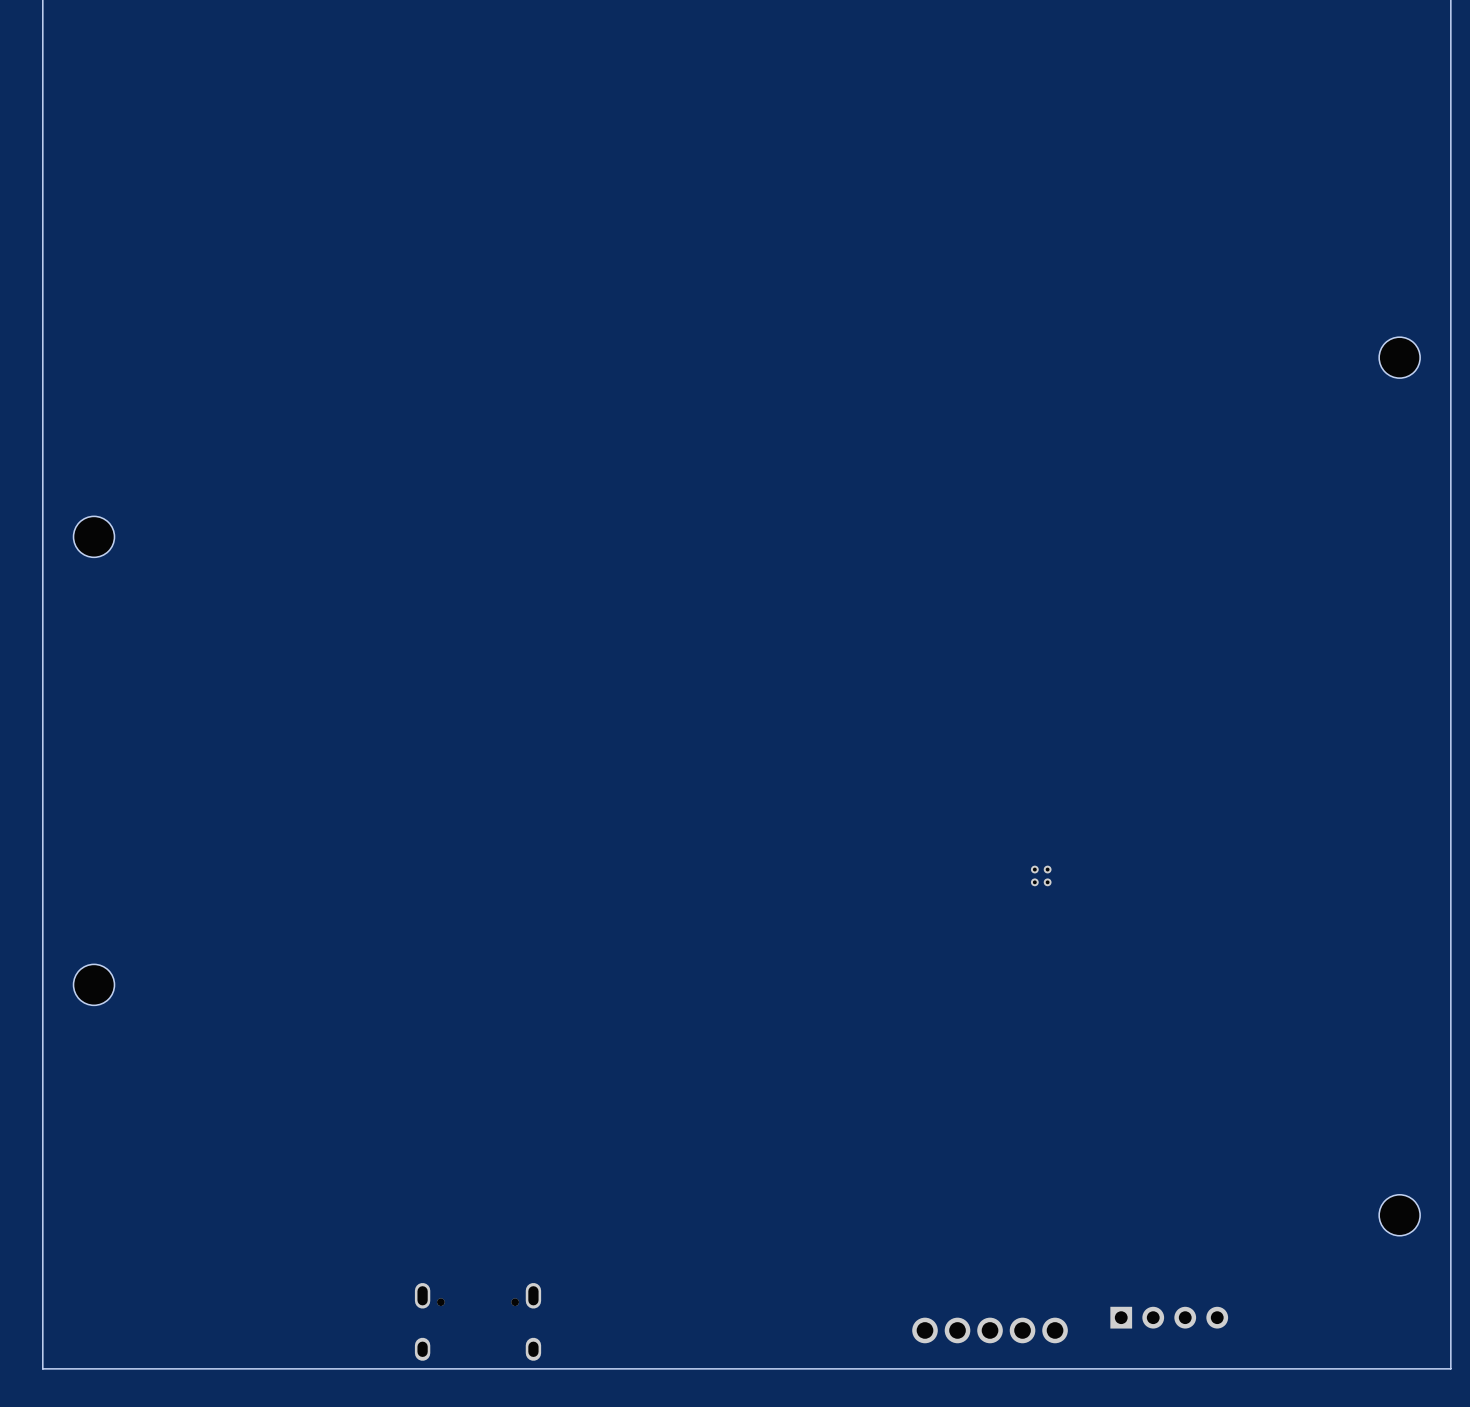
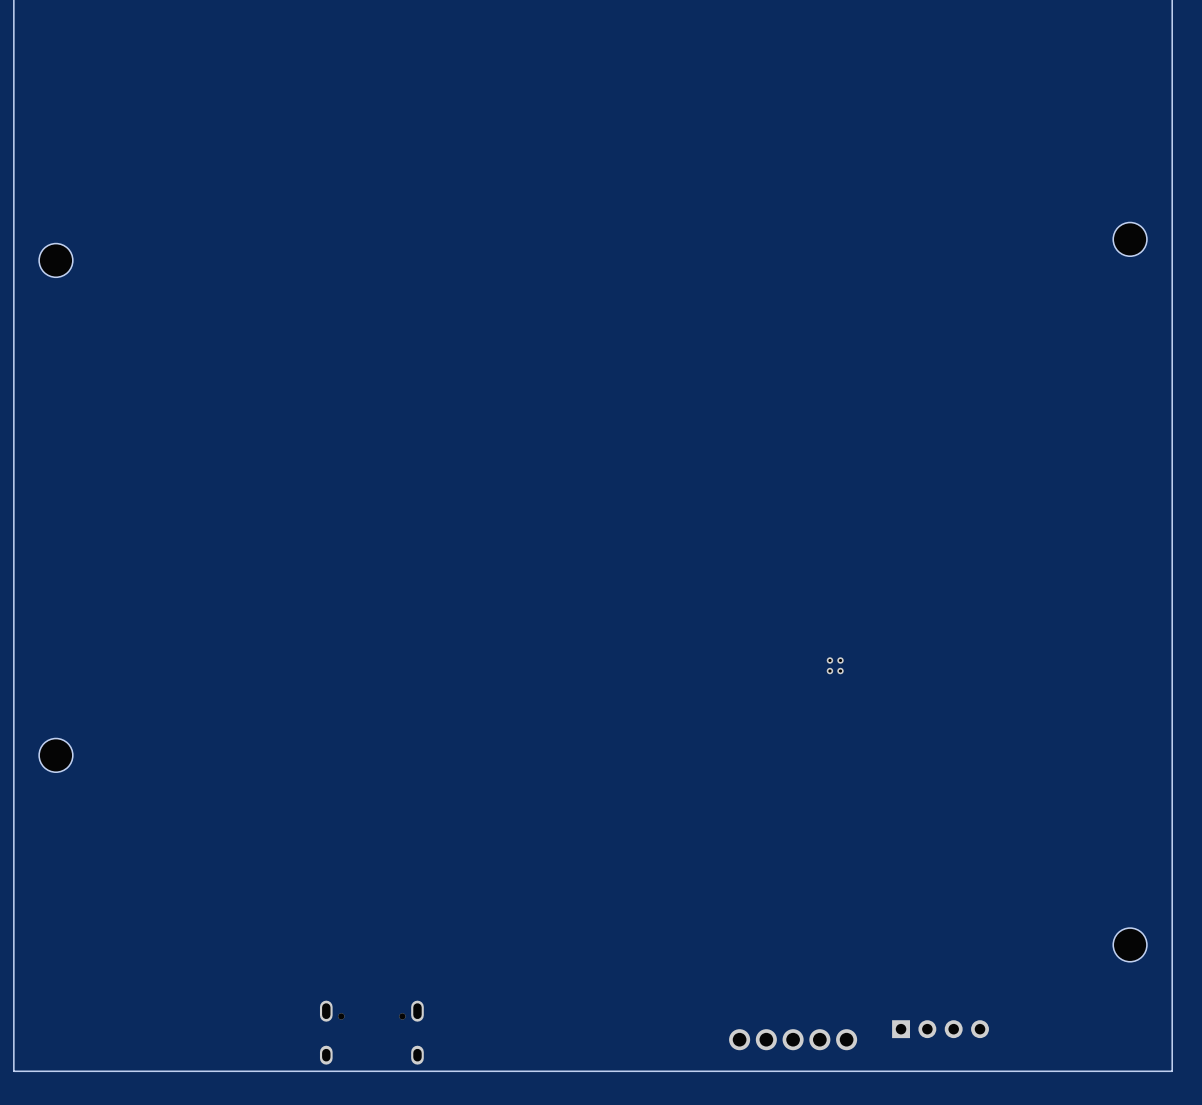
part position: (94, 536) -> (55, 260)

